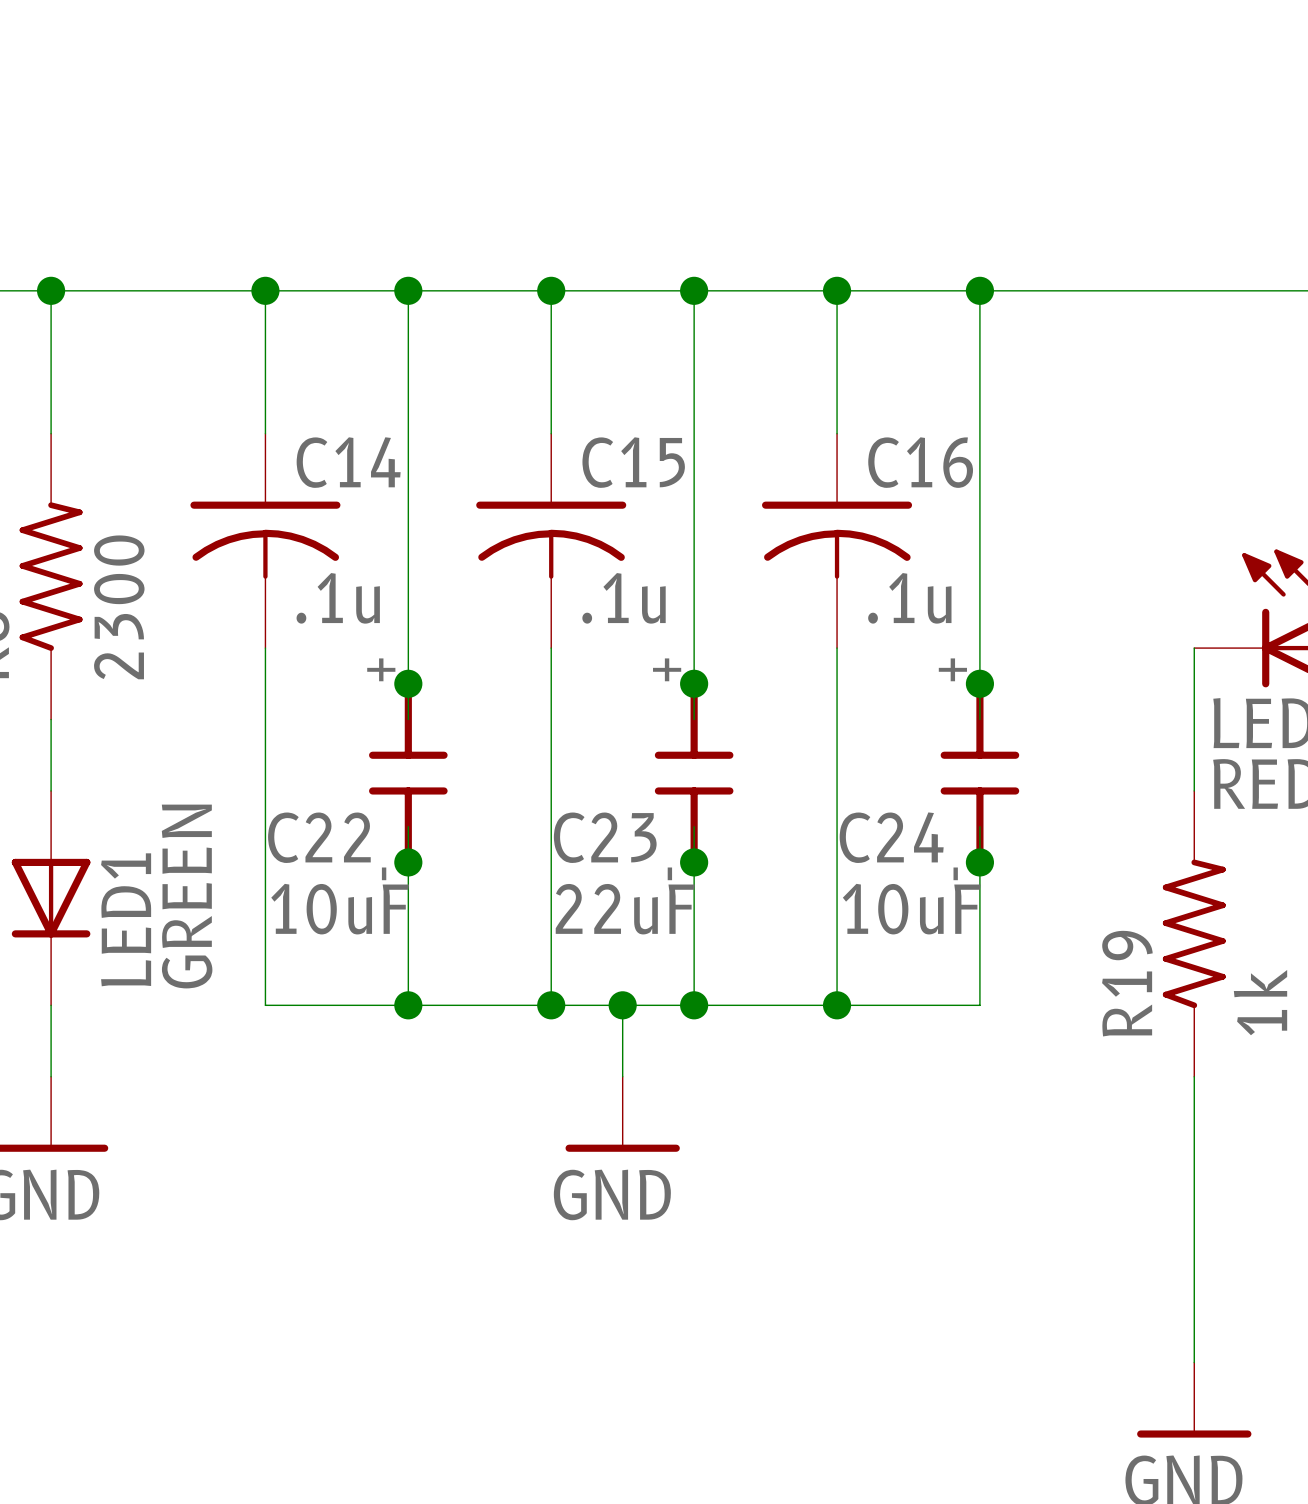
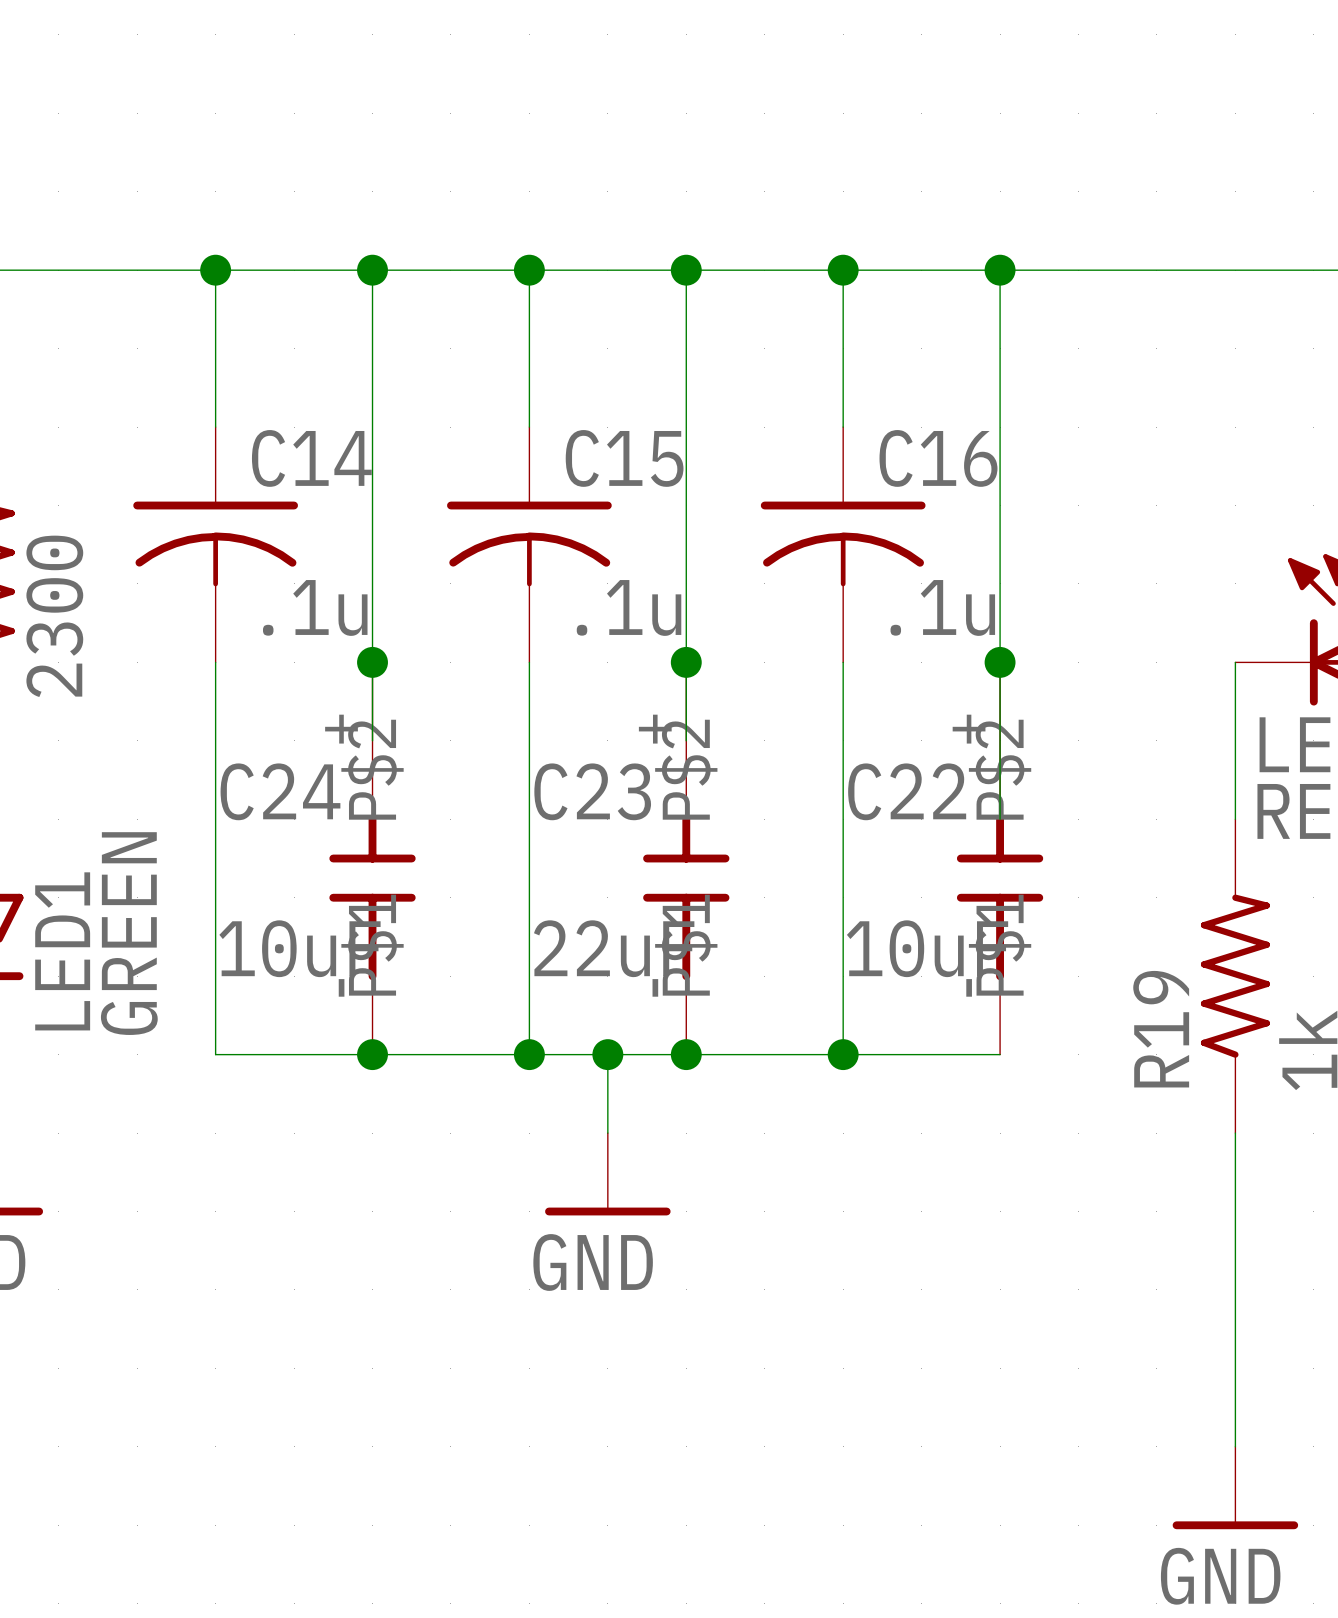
C22 symbol: [369, 680, 448, 867] -> [956, 662, 1044, 1055]
C23 symbol: [654, 680, 734, 867] -> [643, 662, 730, 1055]
C24 symbol: [940, 680, 1020, 867] -> [329, 662, 416, 1055]
junction position: (408, 683) -> (372, 662)
junction position: (694, 683) -> (686, 662)
junction position: (979, 683) -> (1000, 662)
C22 name position: C22 (319, 837) -> C22 (907, 791)
C23 name position: C23 (605, 837) -> C23 (592, 791)
C24 name position: C24 (891, 837) -> C24 (280, 791)
junction: (408, 862) -> none
junction: (694, 862) -> none
junction: (979, 862) -> none

